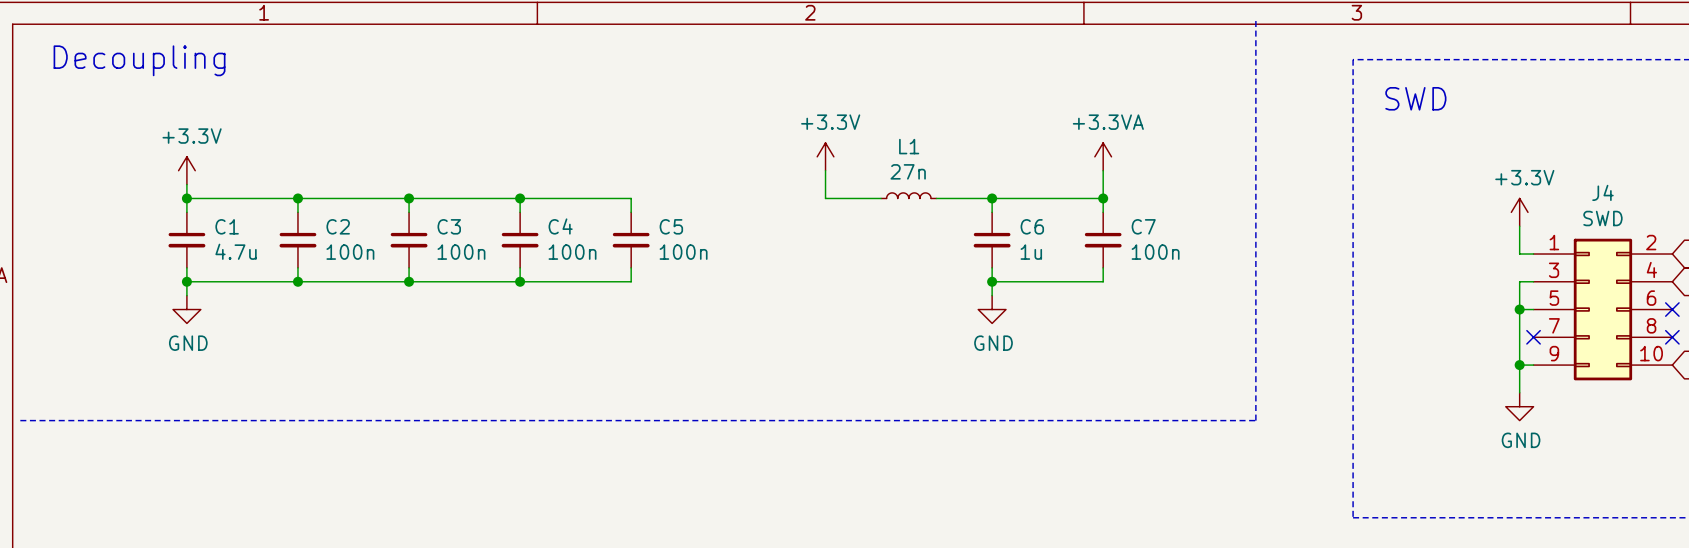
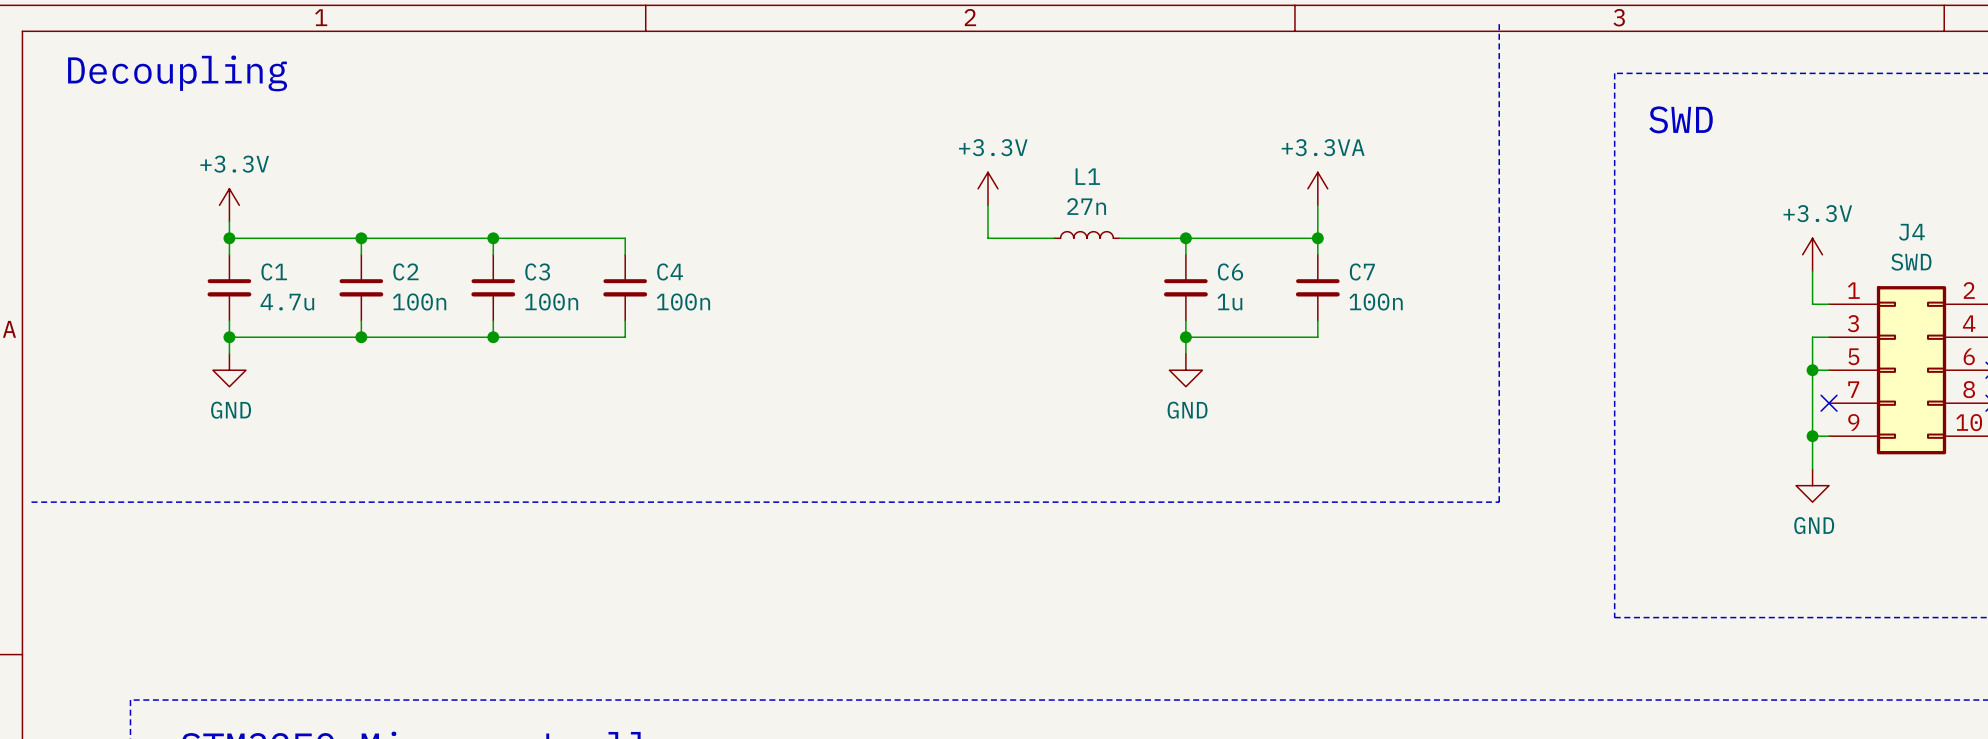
wire: (520, 198) (631, 198) (631, 212) -> none
junction: (520, 198) -> none
C5: 100n (631, 240) -> none
wire: (631, 267) (631, 281) (520, 281) -> none
junction: (520, 281) -> none

